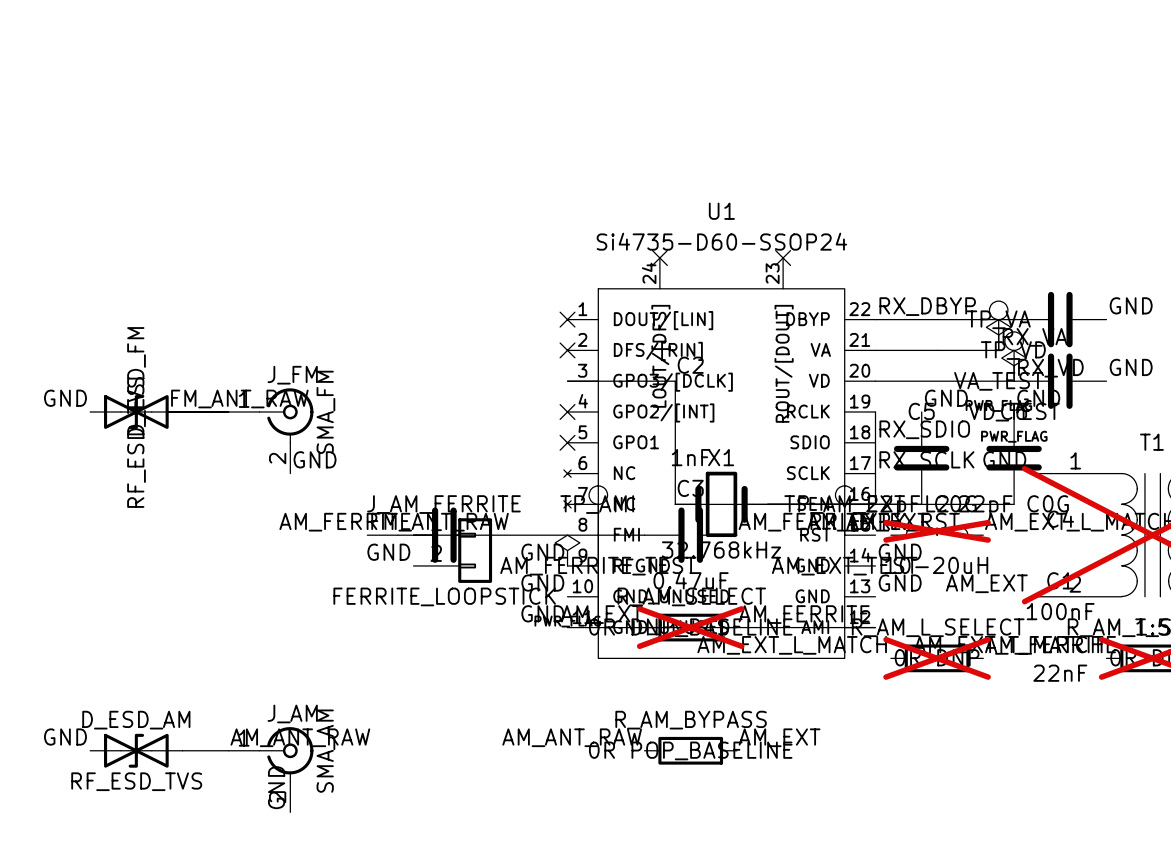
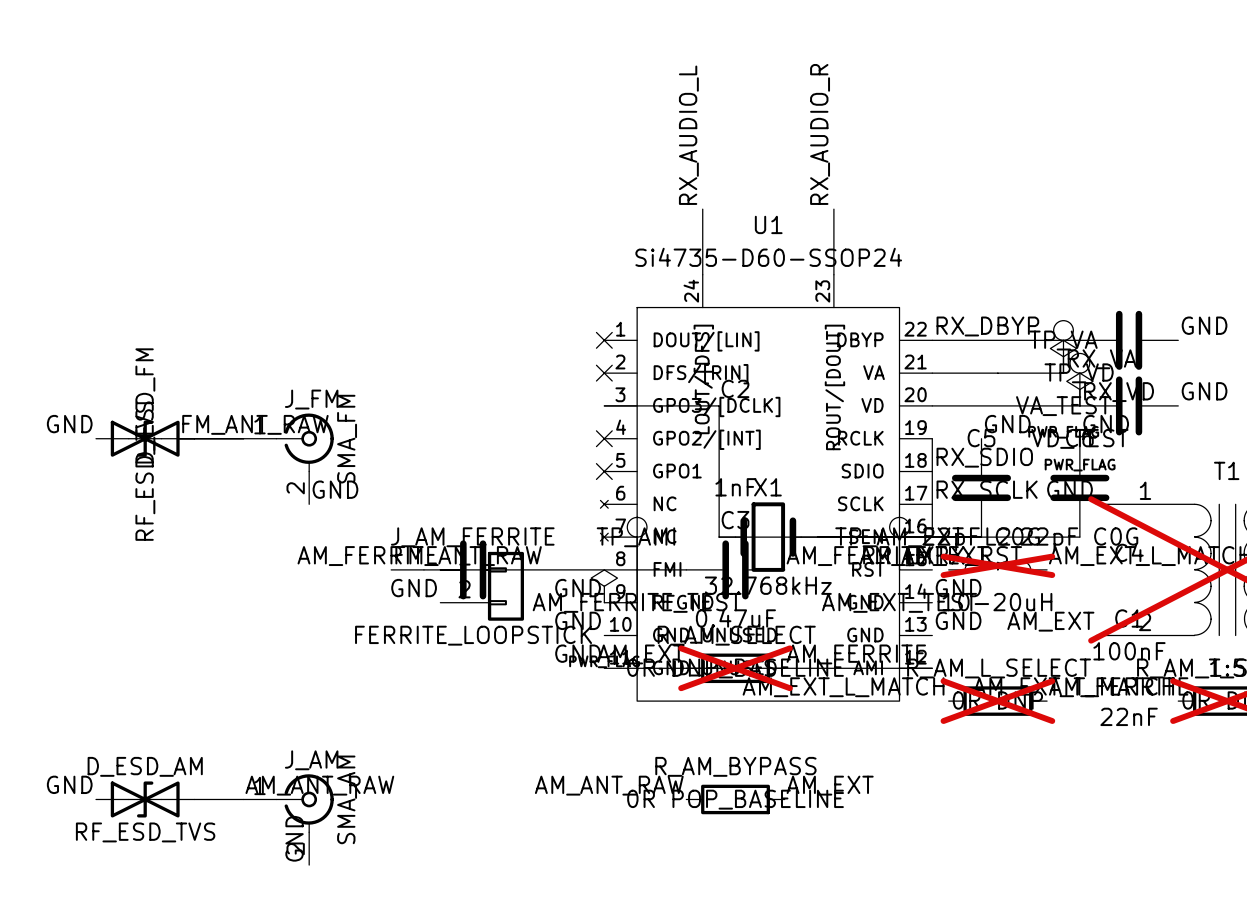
label: none -> RX_AUDIO_R (820, 134)
label: none -> RX_AUDIO_L (688, 135)
wire: none -> (702, 209) (702, 274)
wire: none -> (833, 209) (833, 274)
no-connect mark: (659, 258) -> none
no-connect mark: (783, 258) -> none

